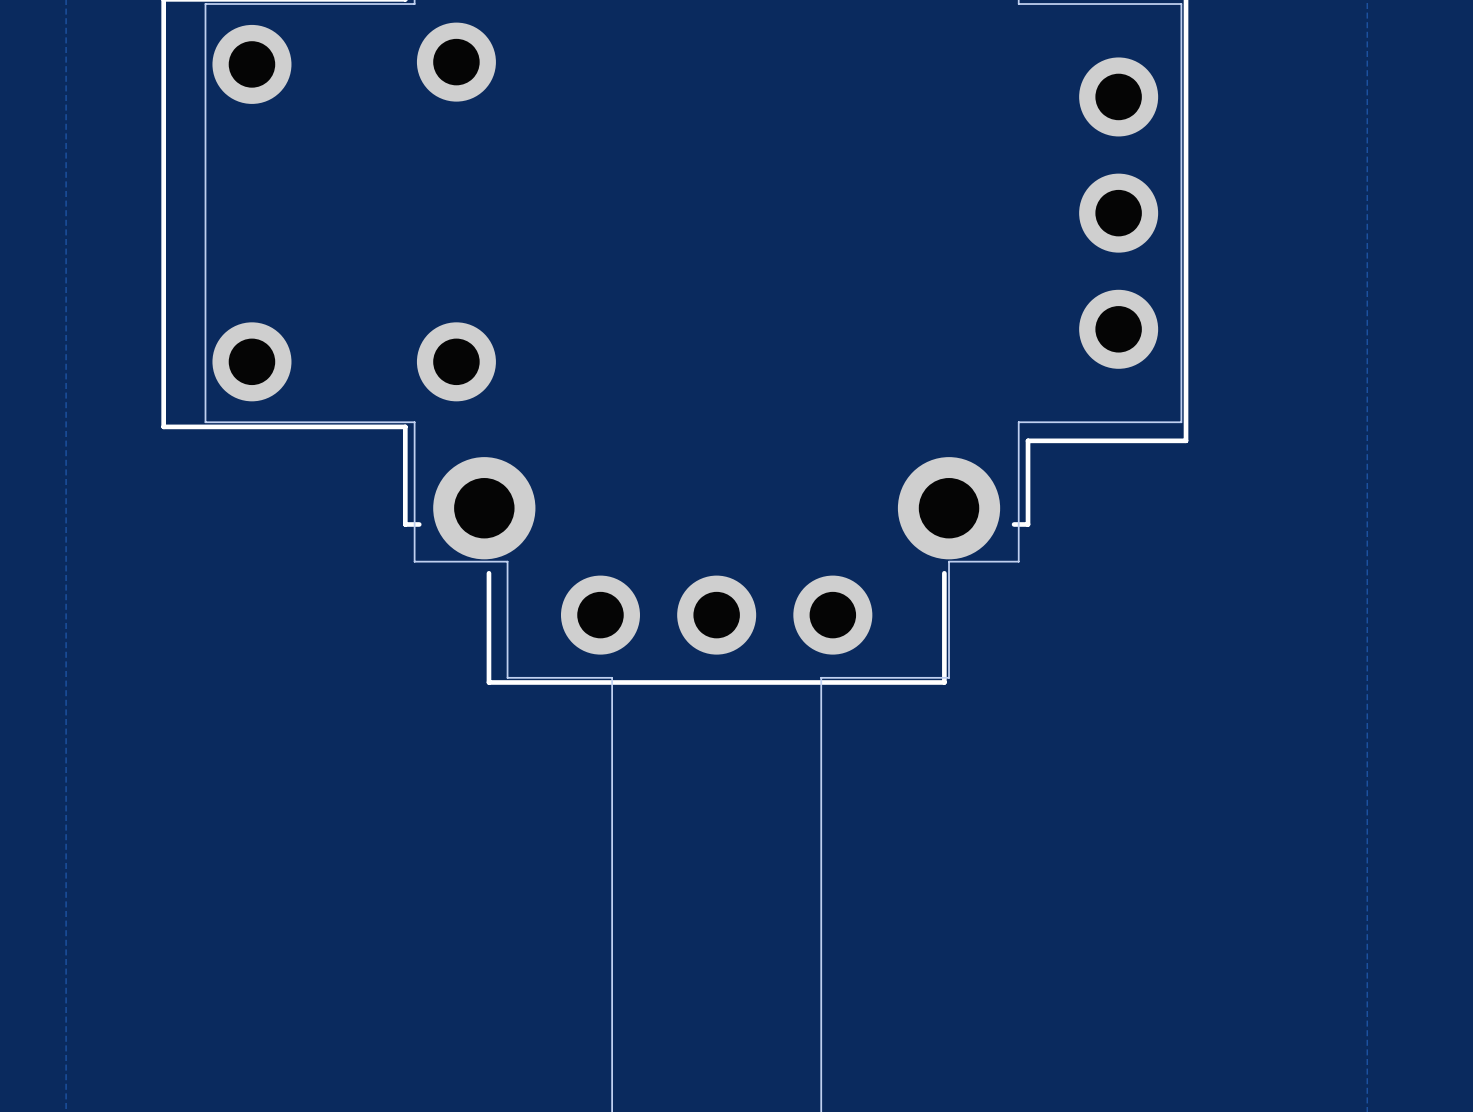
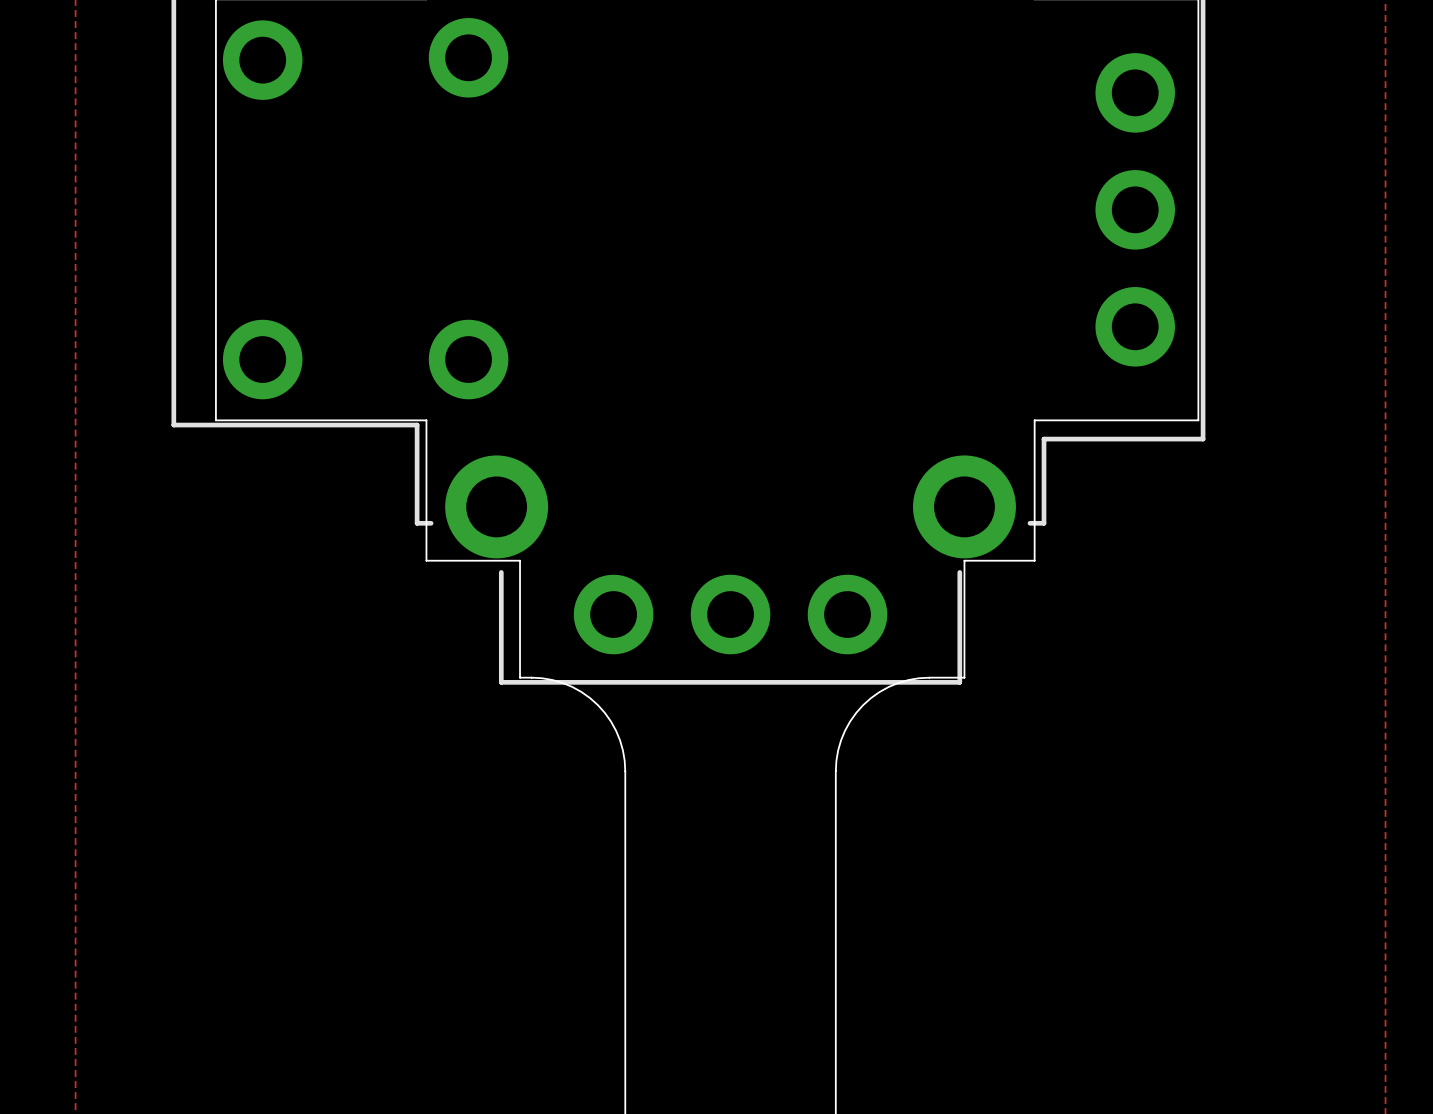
board edge: (519, 677) (612, 677) (612, 770) -> (531, 677) (552, 680) (572, 686) (597, 705) (610, 721) (620, 740) (625, 771)
board edge: (914, 677) (821, 677) (821, 770) -> (929, 677) (908, 680) (888, 686) (863, 705) (850, 721) (841, 740) (835, 771)

